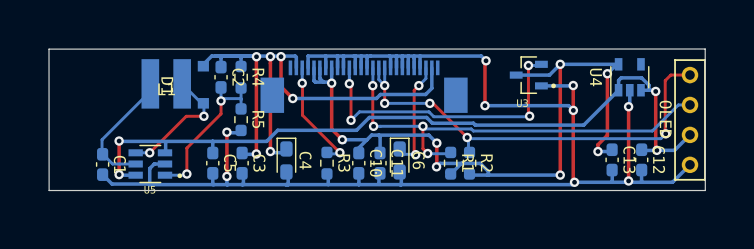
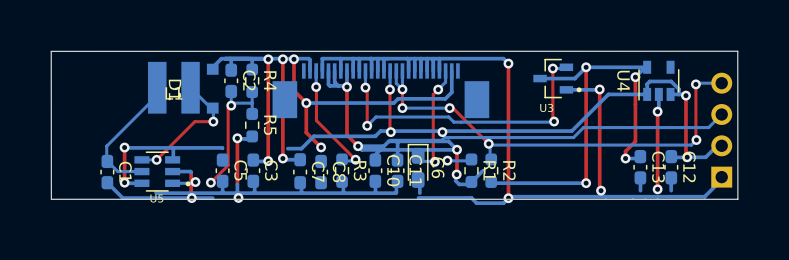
part footprint: [674, 59, 706, 181] -> [711, 72, 733, 188]
top track: (486, 60) (484, 105) -> (508, 63) (508, 198)
top track: (690, 75) (670, 75) (665, 80) -> none
bottom track: none -> (719, 83) (695, 84)
via: none -> (695, 84)
bottom track: (618, 90) (583, 125) (475, 125) (473, 123) (432, 123) (426, 117) (369, 117) (356, 130) -> (647, 94) (608, 94) (571, 131) (380, 131) (372, 136)
top track: none -> (306, 103) (306, 132) (321, 147)
top track: (221, 100) (221, 113) (186, 148) (186, 174) -> (231, 105) (228, 108) (228, 165) (210, 182)
bottom track: (690, 104) (678, 104) (652, 131) (473, 131) (471, 128) (425, 128) (422, 126) (373, 126) -> none
bottom track: (484, 105) (568, 105) (573, 110) -> none
via: (484, 105) -> none
via: (573, 110) -> none
bottom track: none -> (721, 117) (719, 117) (708, 127) (583, 127) (573, 137) (444, 137) (441, 140) (390, 140)
top track: (422, 126) (422, 148) (427, 153) -> none
bottom track: (299, 130) (277, 130) (266, 141) (213, 141) (212, 153) -> (313, 136) (301, 148) (287, 148)
via: none -> (321, 147)
bottom track: none -> (360, 148) (455, 149)
C4: (286, 158) -> none
C7: none -> (300, 171)
bottom track: (165, 164) (154, 164) (149, 168) (149, 184) (112, 184) -> (212, 198) (122, 198) (117, 192)
bottom track: none -> (172, 171) (191, 172)
top track: none -> (191, 172) (191, 198)
C8: none -> (321, 172)
bottom track: (690, 164) (672, 182) (628, 180) (574, 182) (572, 184) (380, 184) -> none
bottom track: (436, 166) (439, 163) (480, 163) (488, 171) (488, 175) -> none
bottom track: none -> (721, 179) (704, 196) (509, 196) (503, 203) (476, 203) (471, 197) (418, 197)
bottom track: none -> (455, 180) (459, 184) (467, 184)
via: none -> (210, 182)
via: (226, 176) -> none
via: none -> (191, 198)
via: none -> (238, 197)
via: none -> (508, 198)

